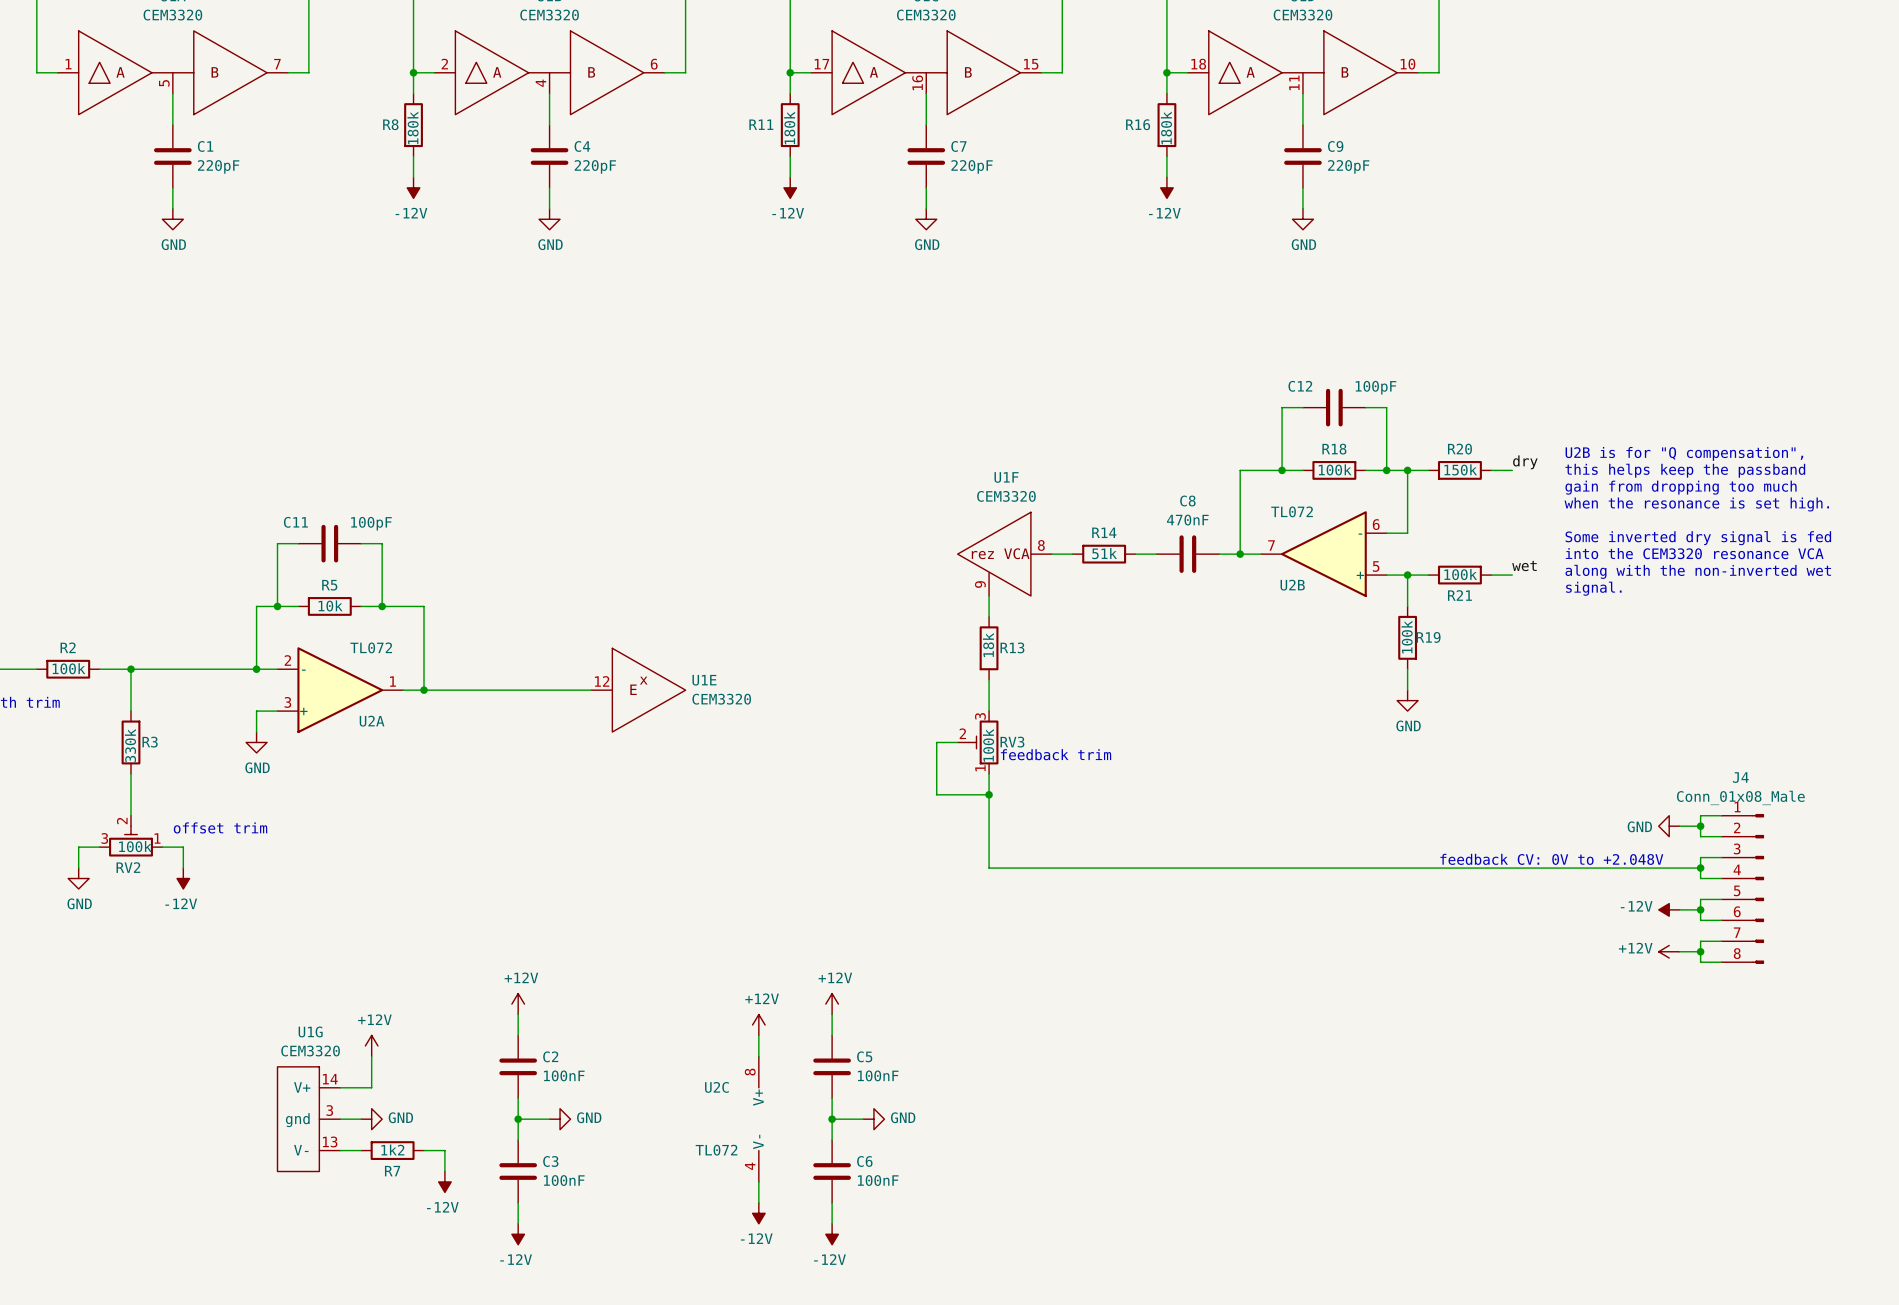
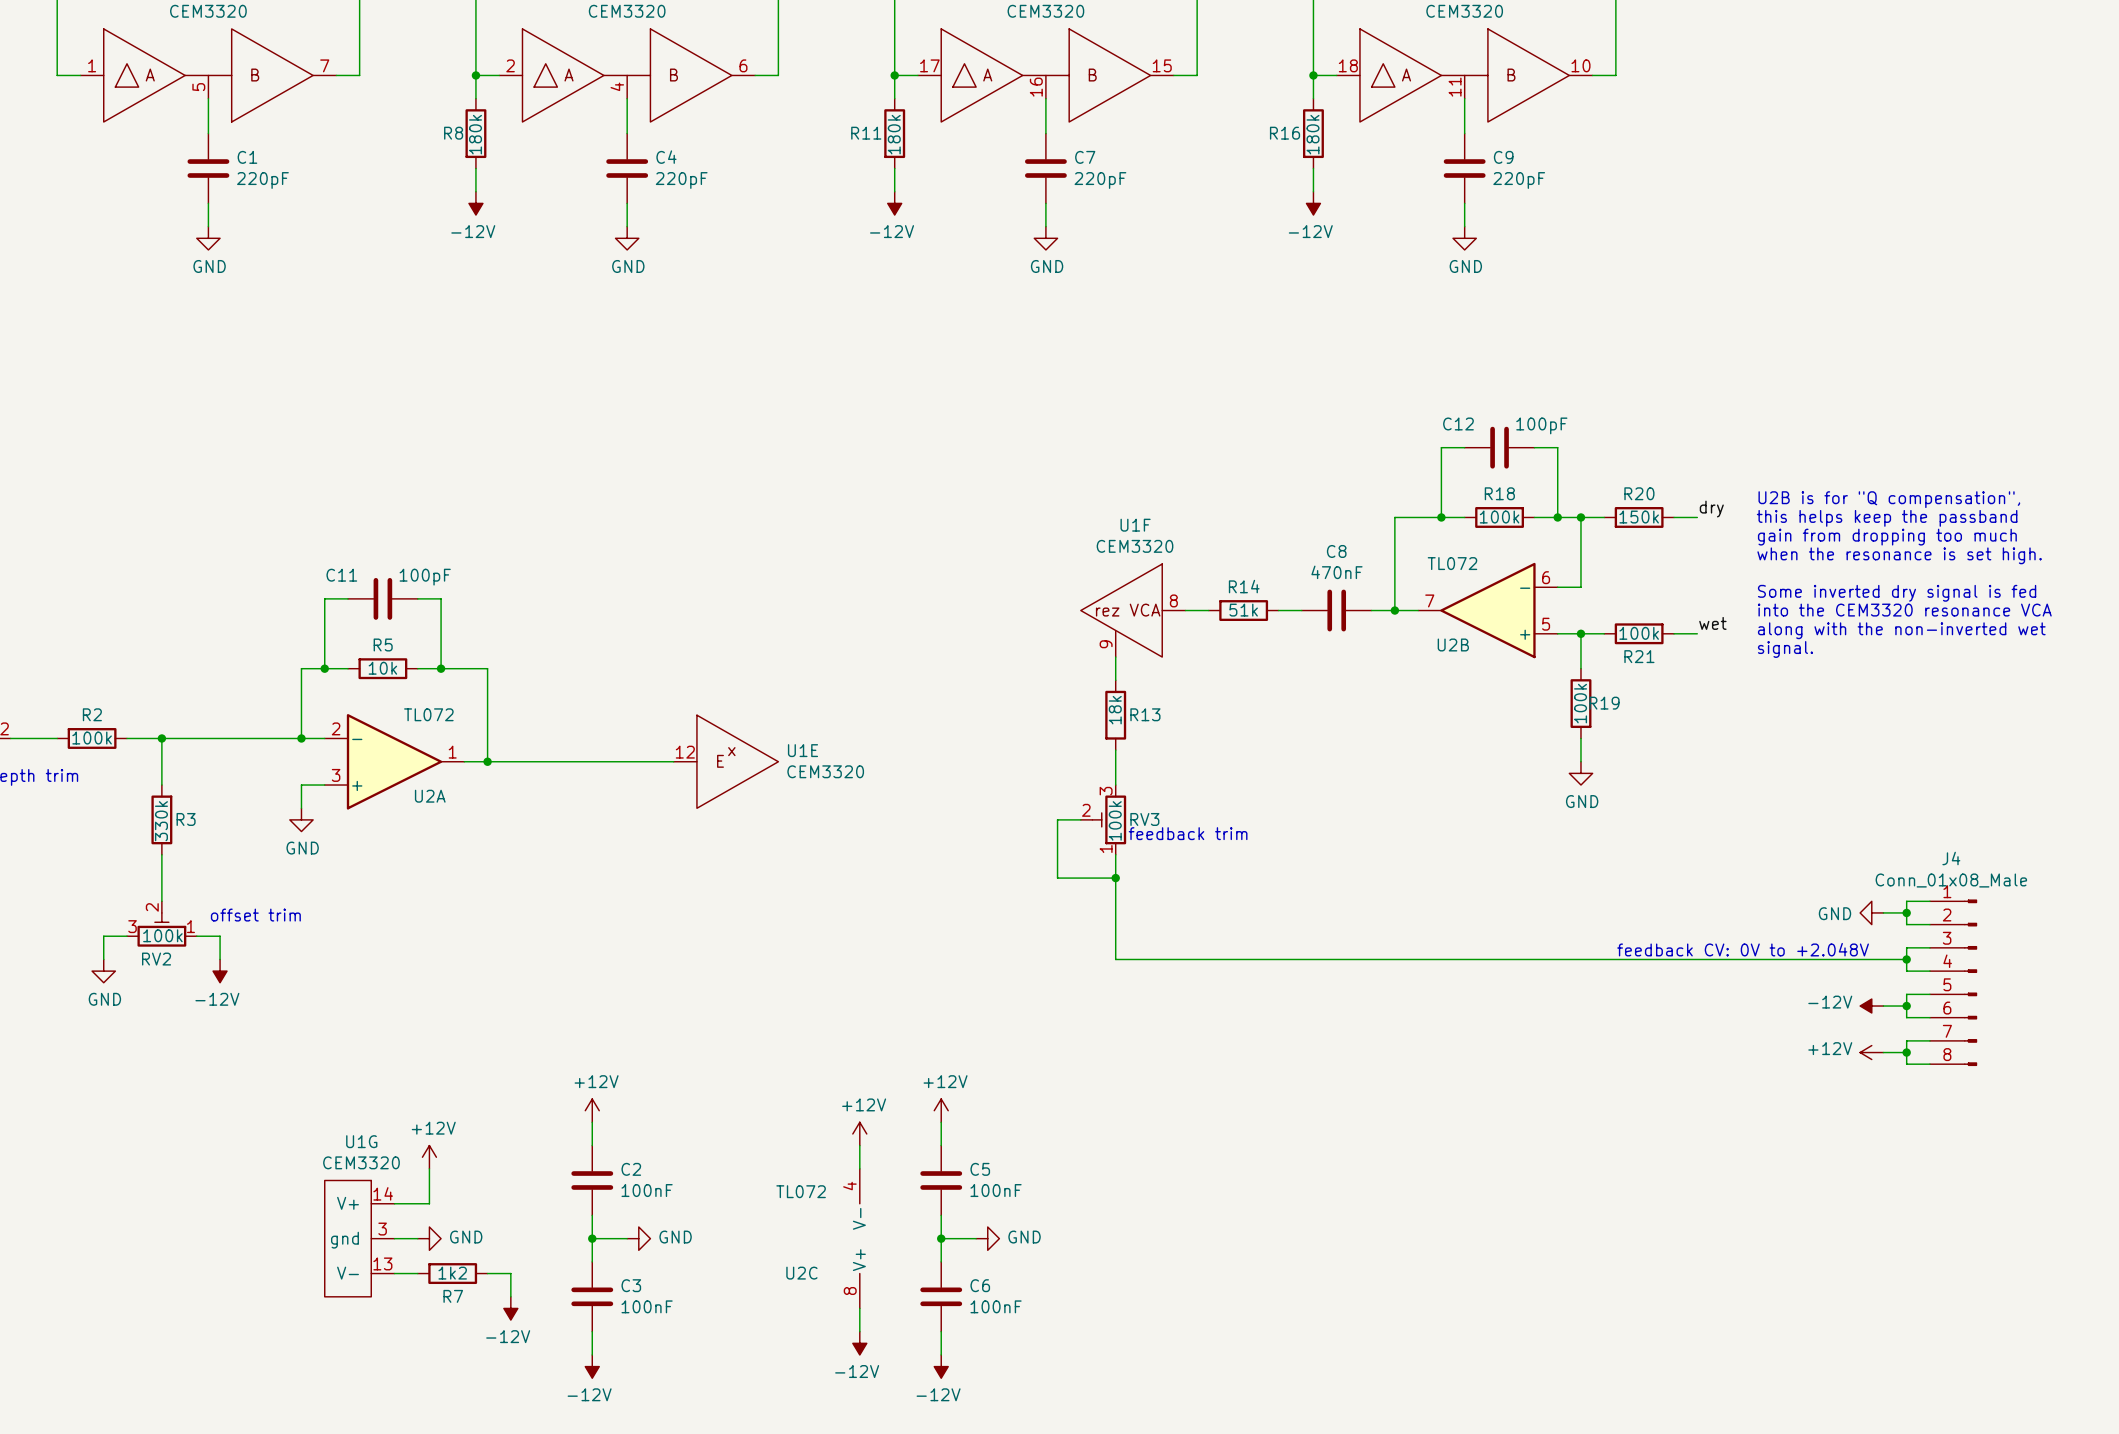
U2C name position: U2C (716, 1087) -> U2C (801, 1273)
U2C rotation: 0° (758, 1119) -> 180° (859, 1238)
U2C value position: TL072 (716, 1150) -> TL072 (801, 1191)

